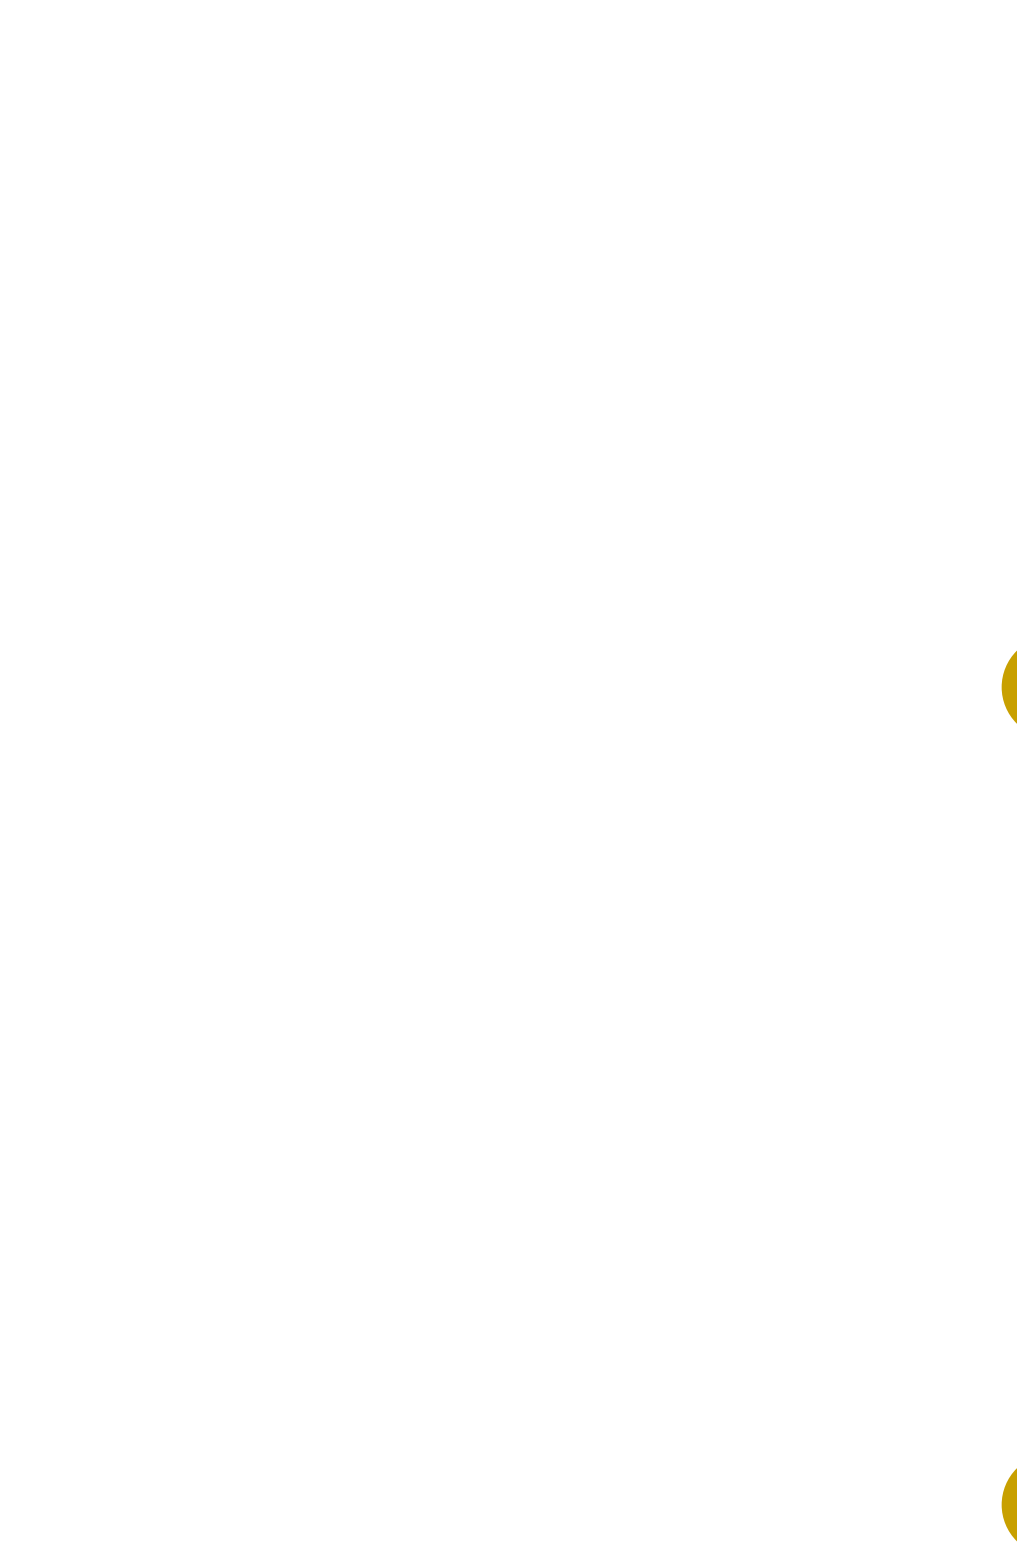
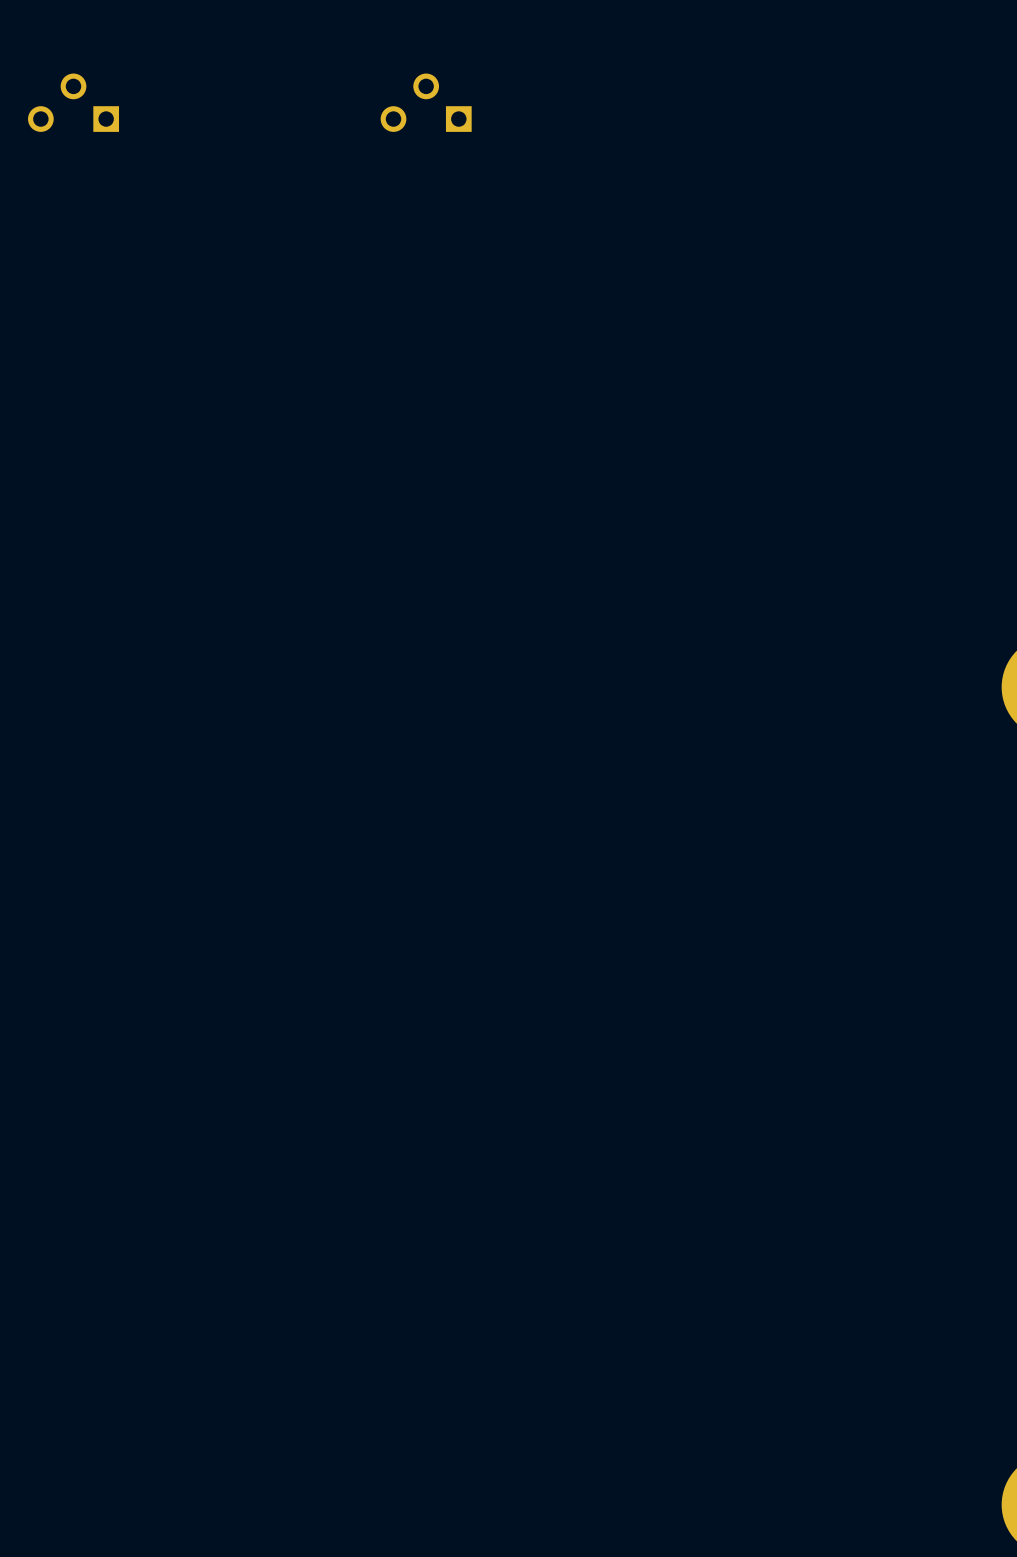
part: none -> (73, 102)
part: none -> (426, 102)

